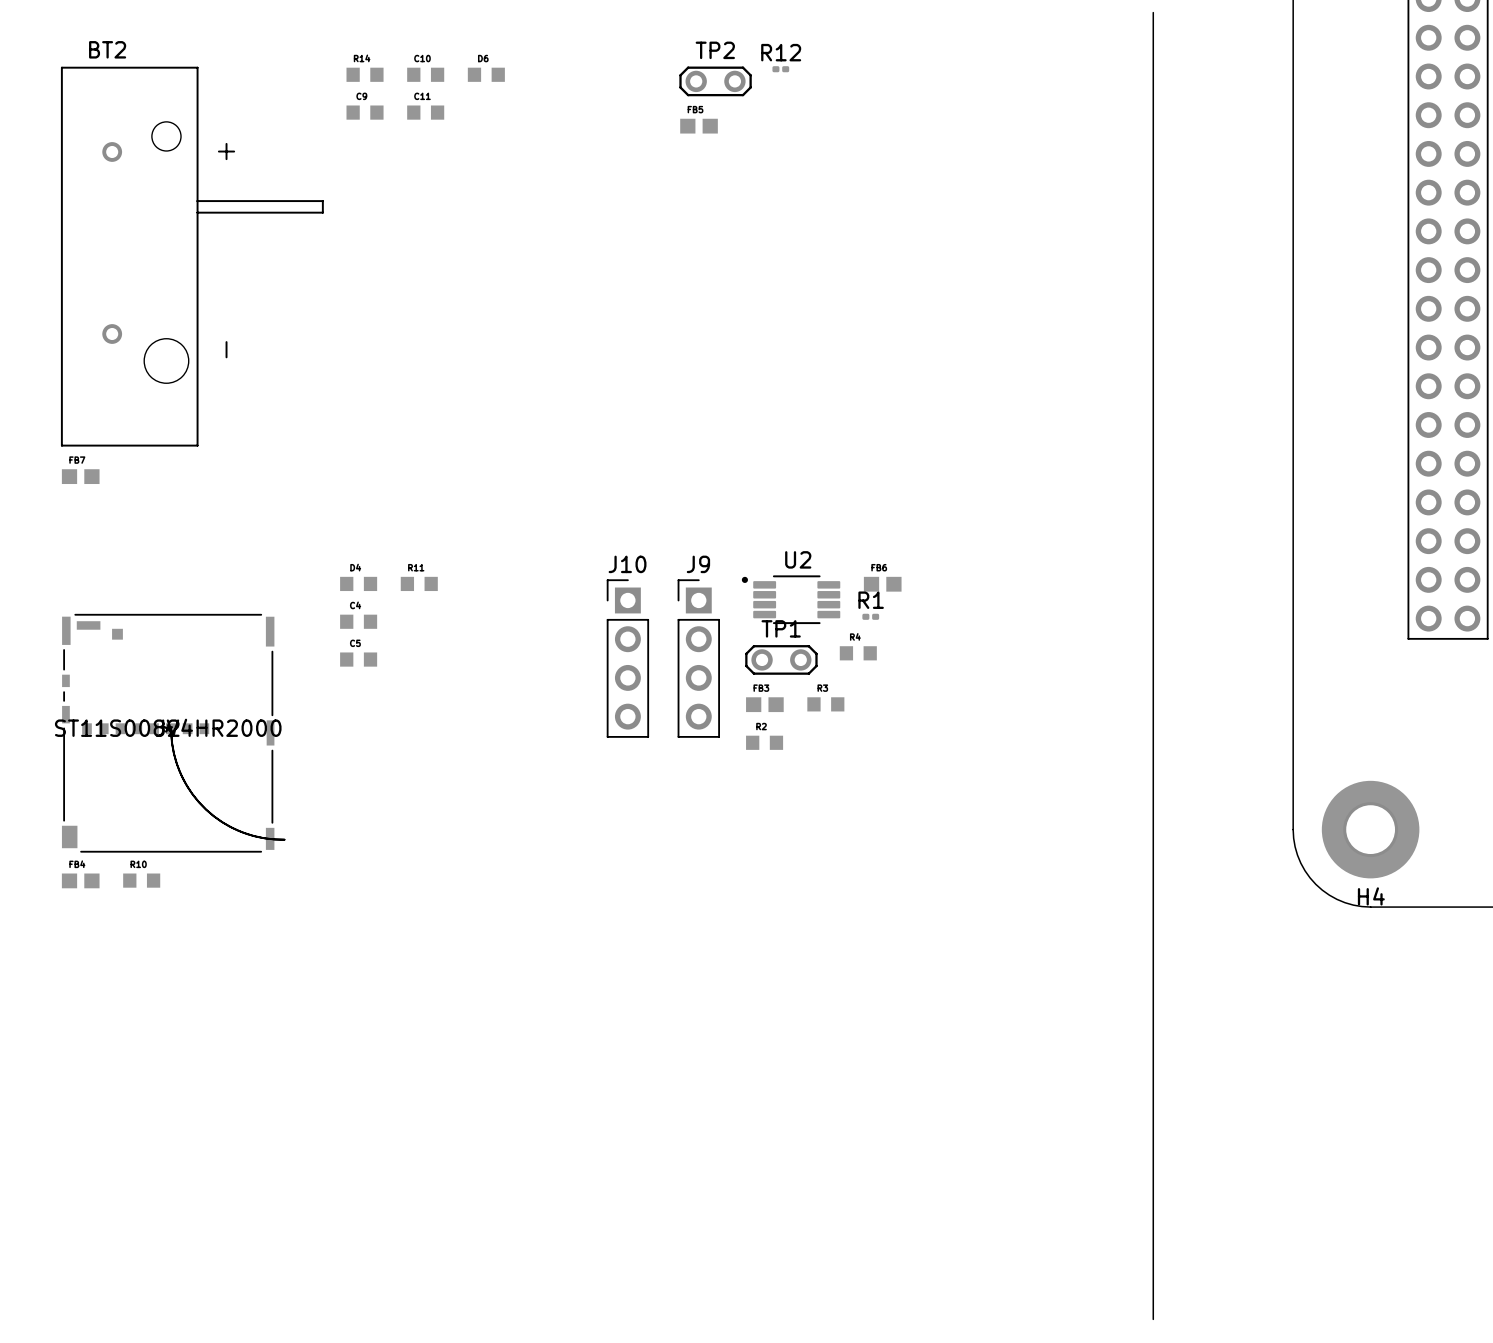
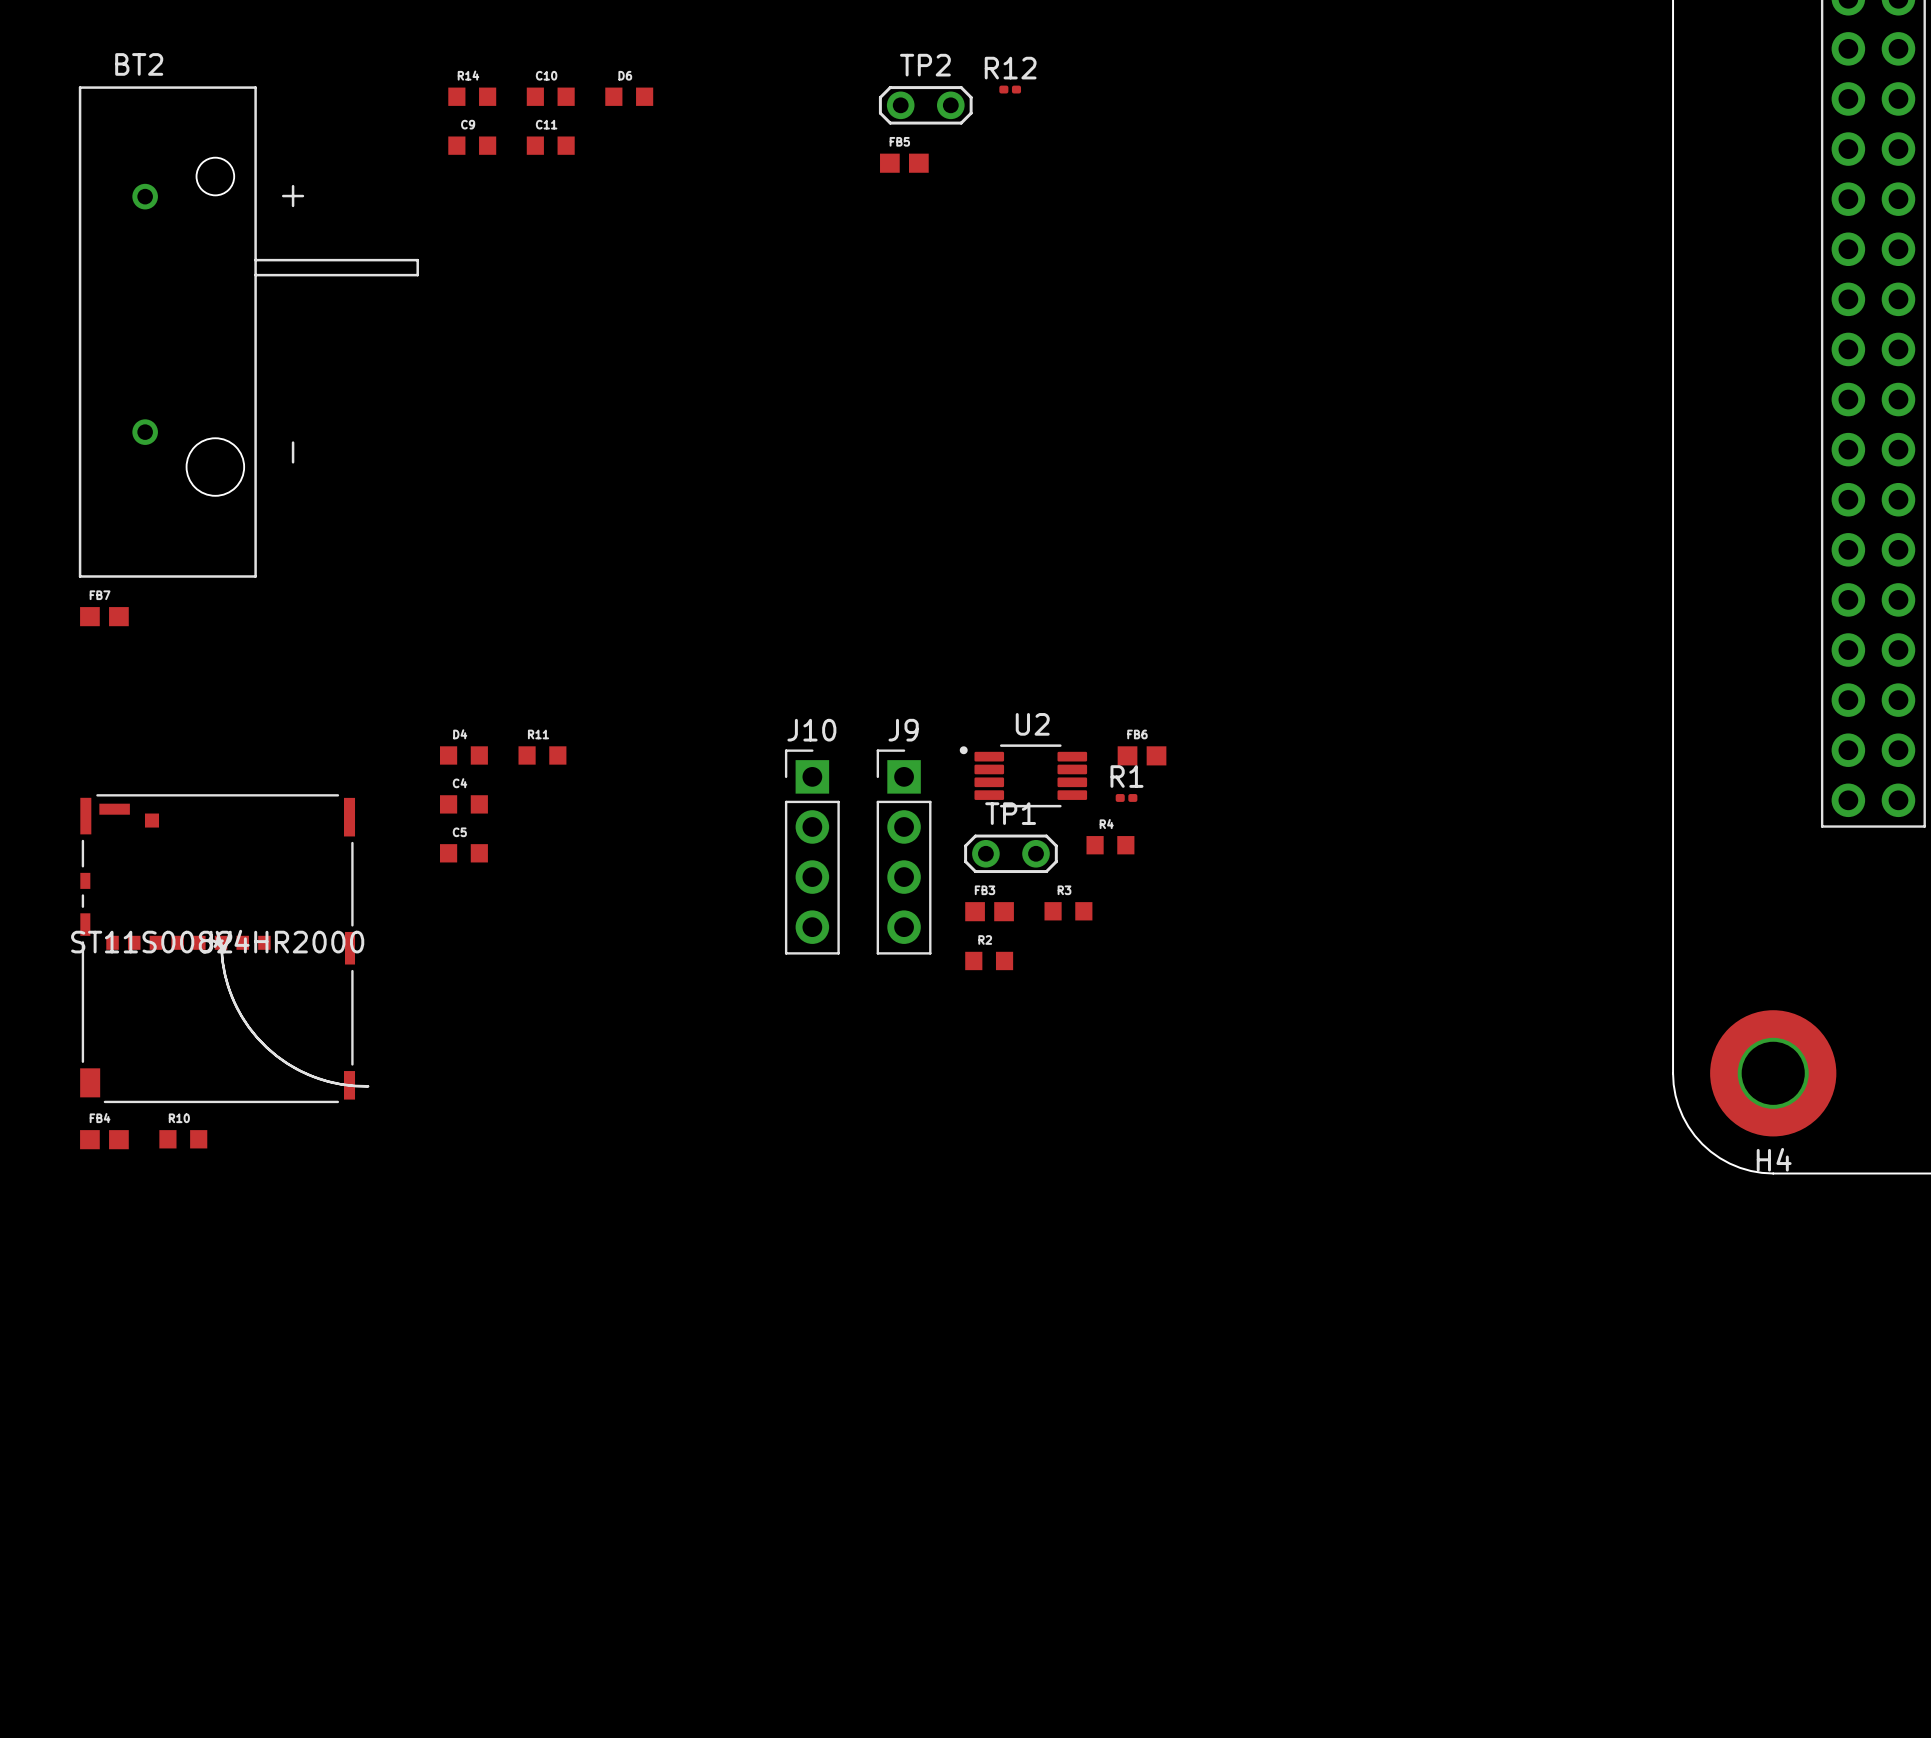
board edge: (1153, 12) (1153, 1319) -> none

